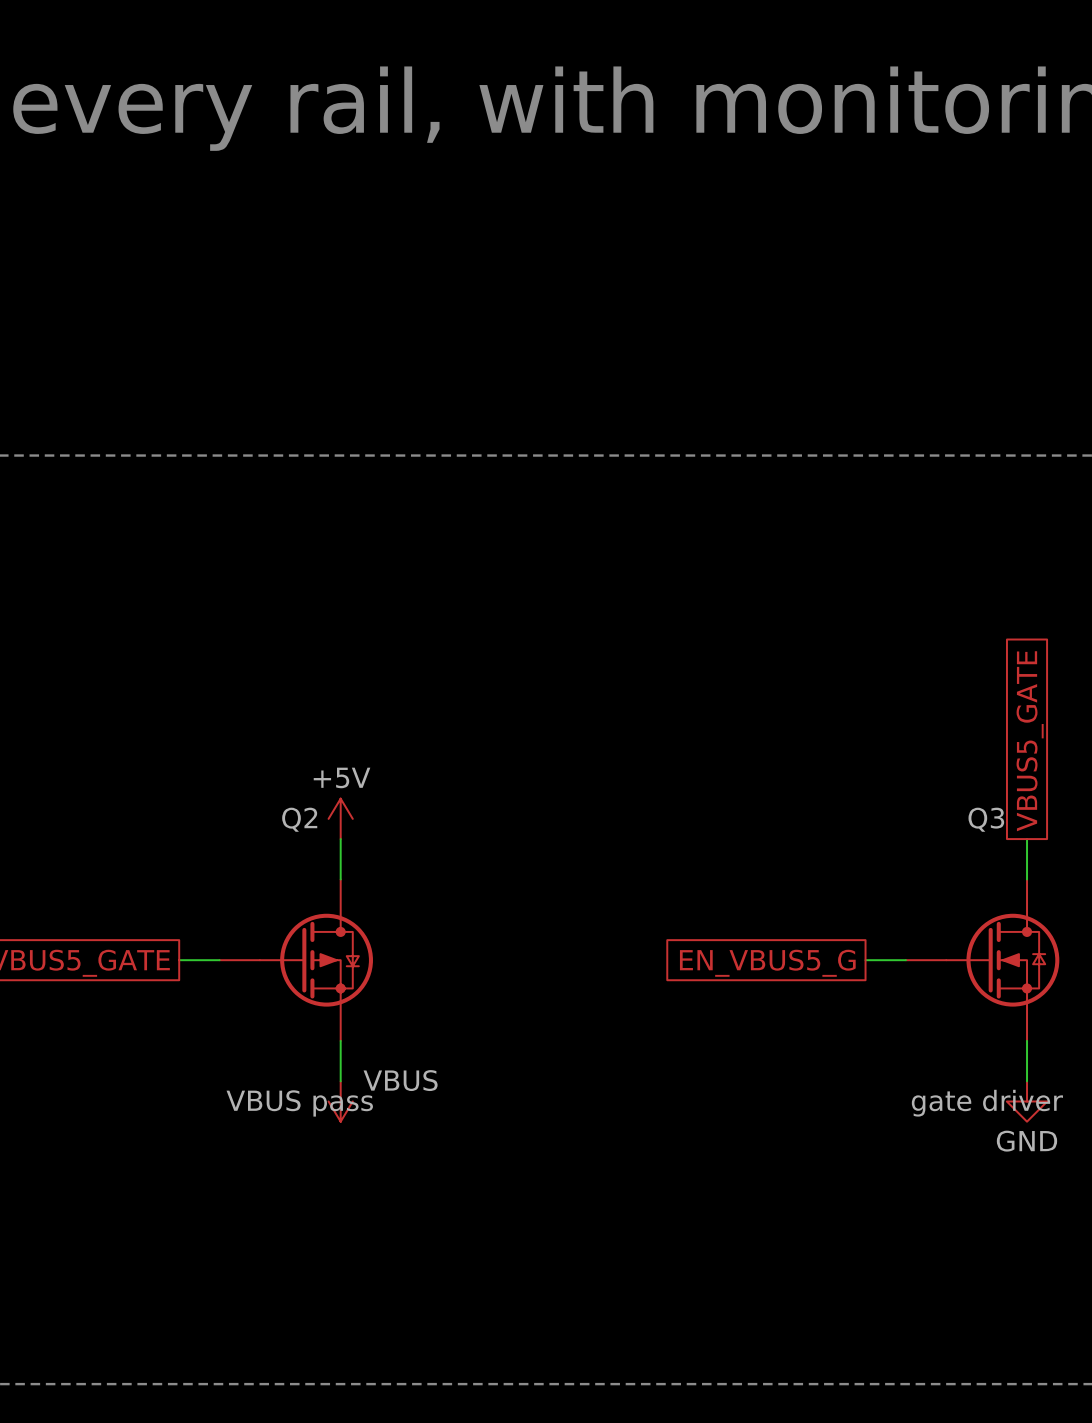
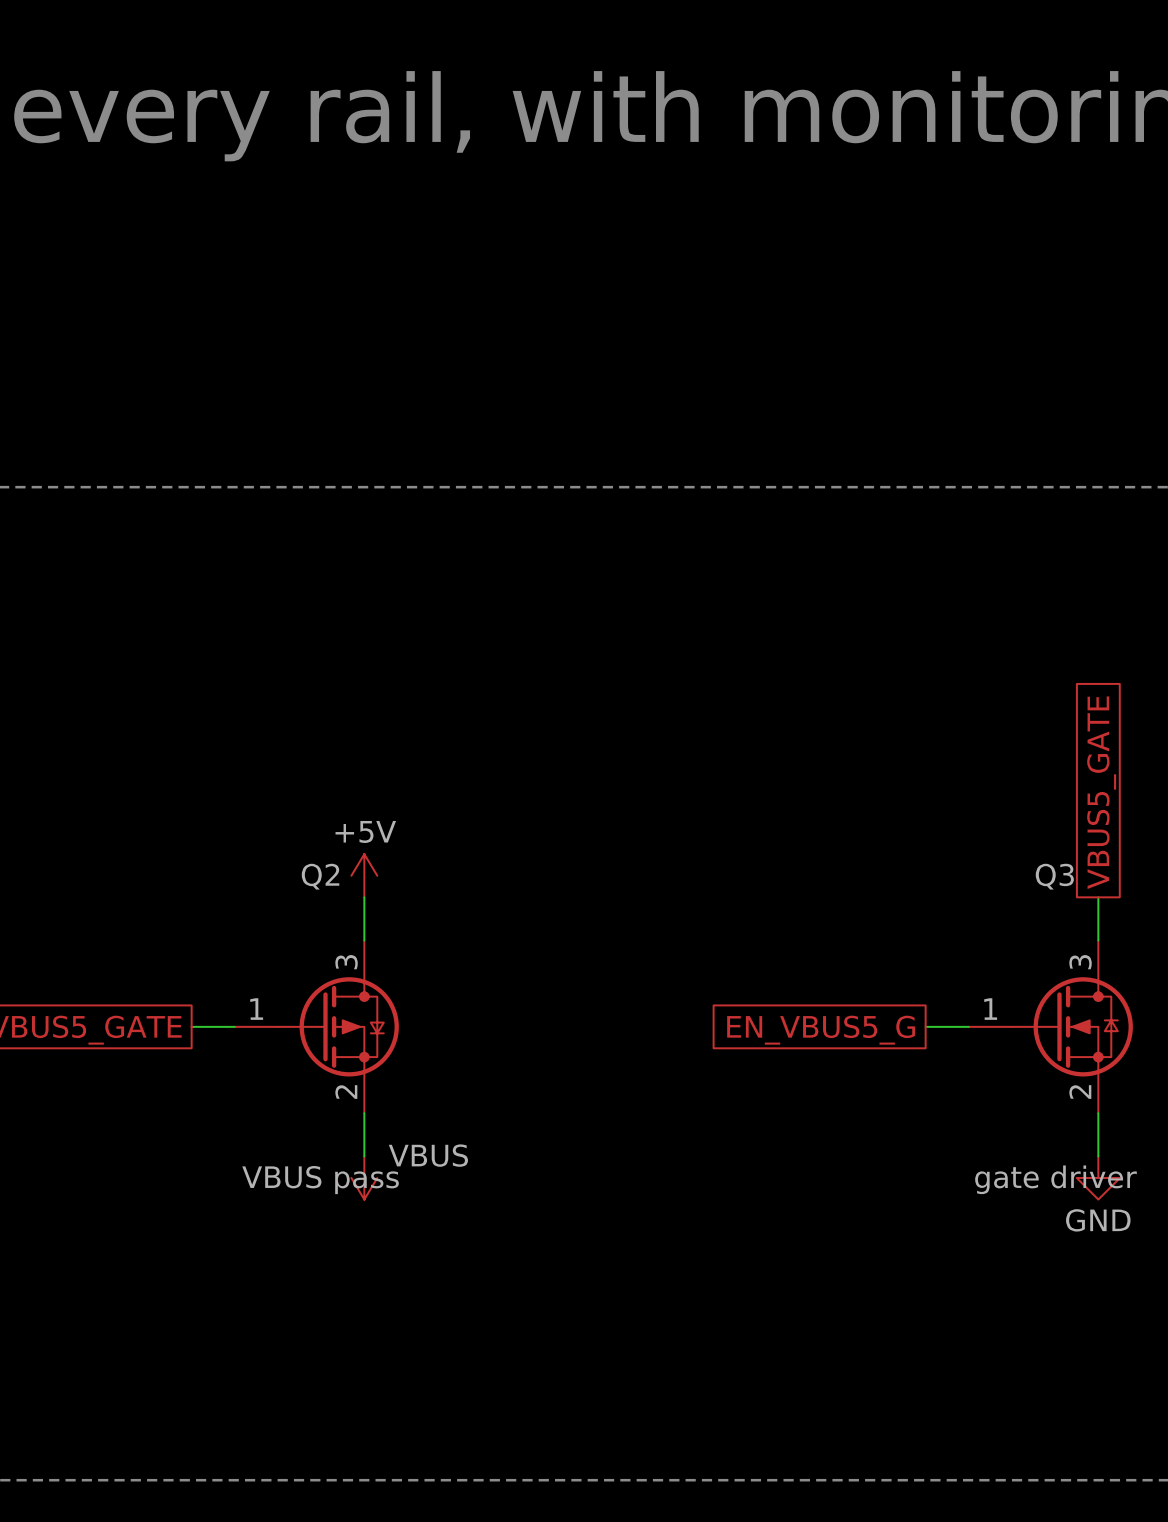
Q2 pin number: none -> 3 (346, 962)
Q3 pin number: none -> 3 (1080, 962)
Q2 pin number: none -> 1 (256, 1009)
Q3 pin number: none -> 1 (990, 1009)
Q2 pin number: none -> 2 (346, 1092)
Q3 pin number: none -> 2 (1080, 1092)

